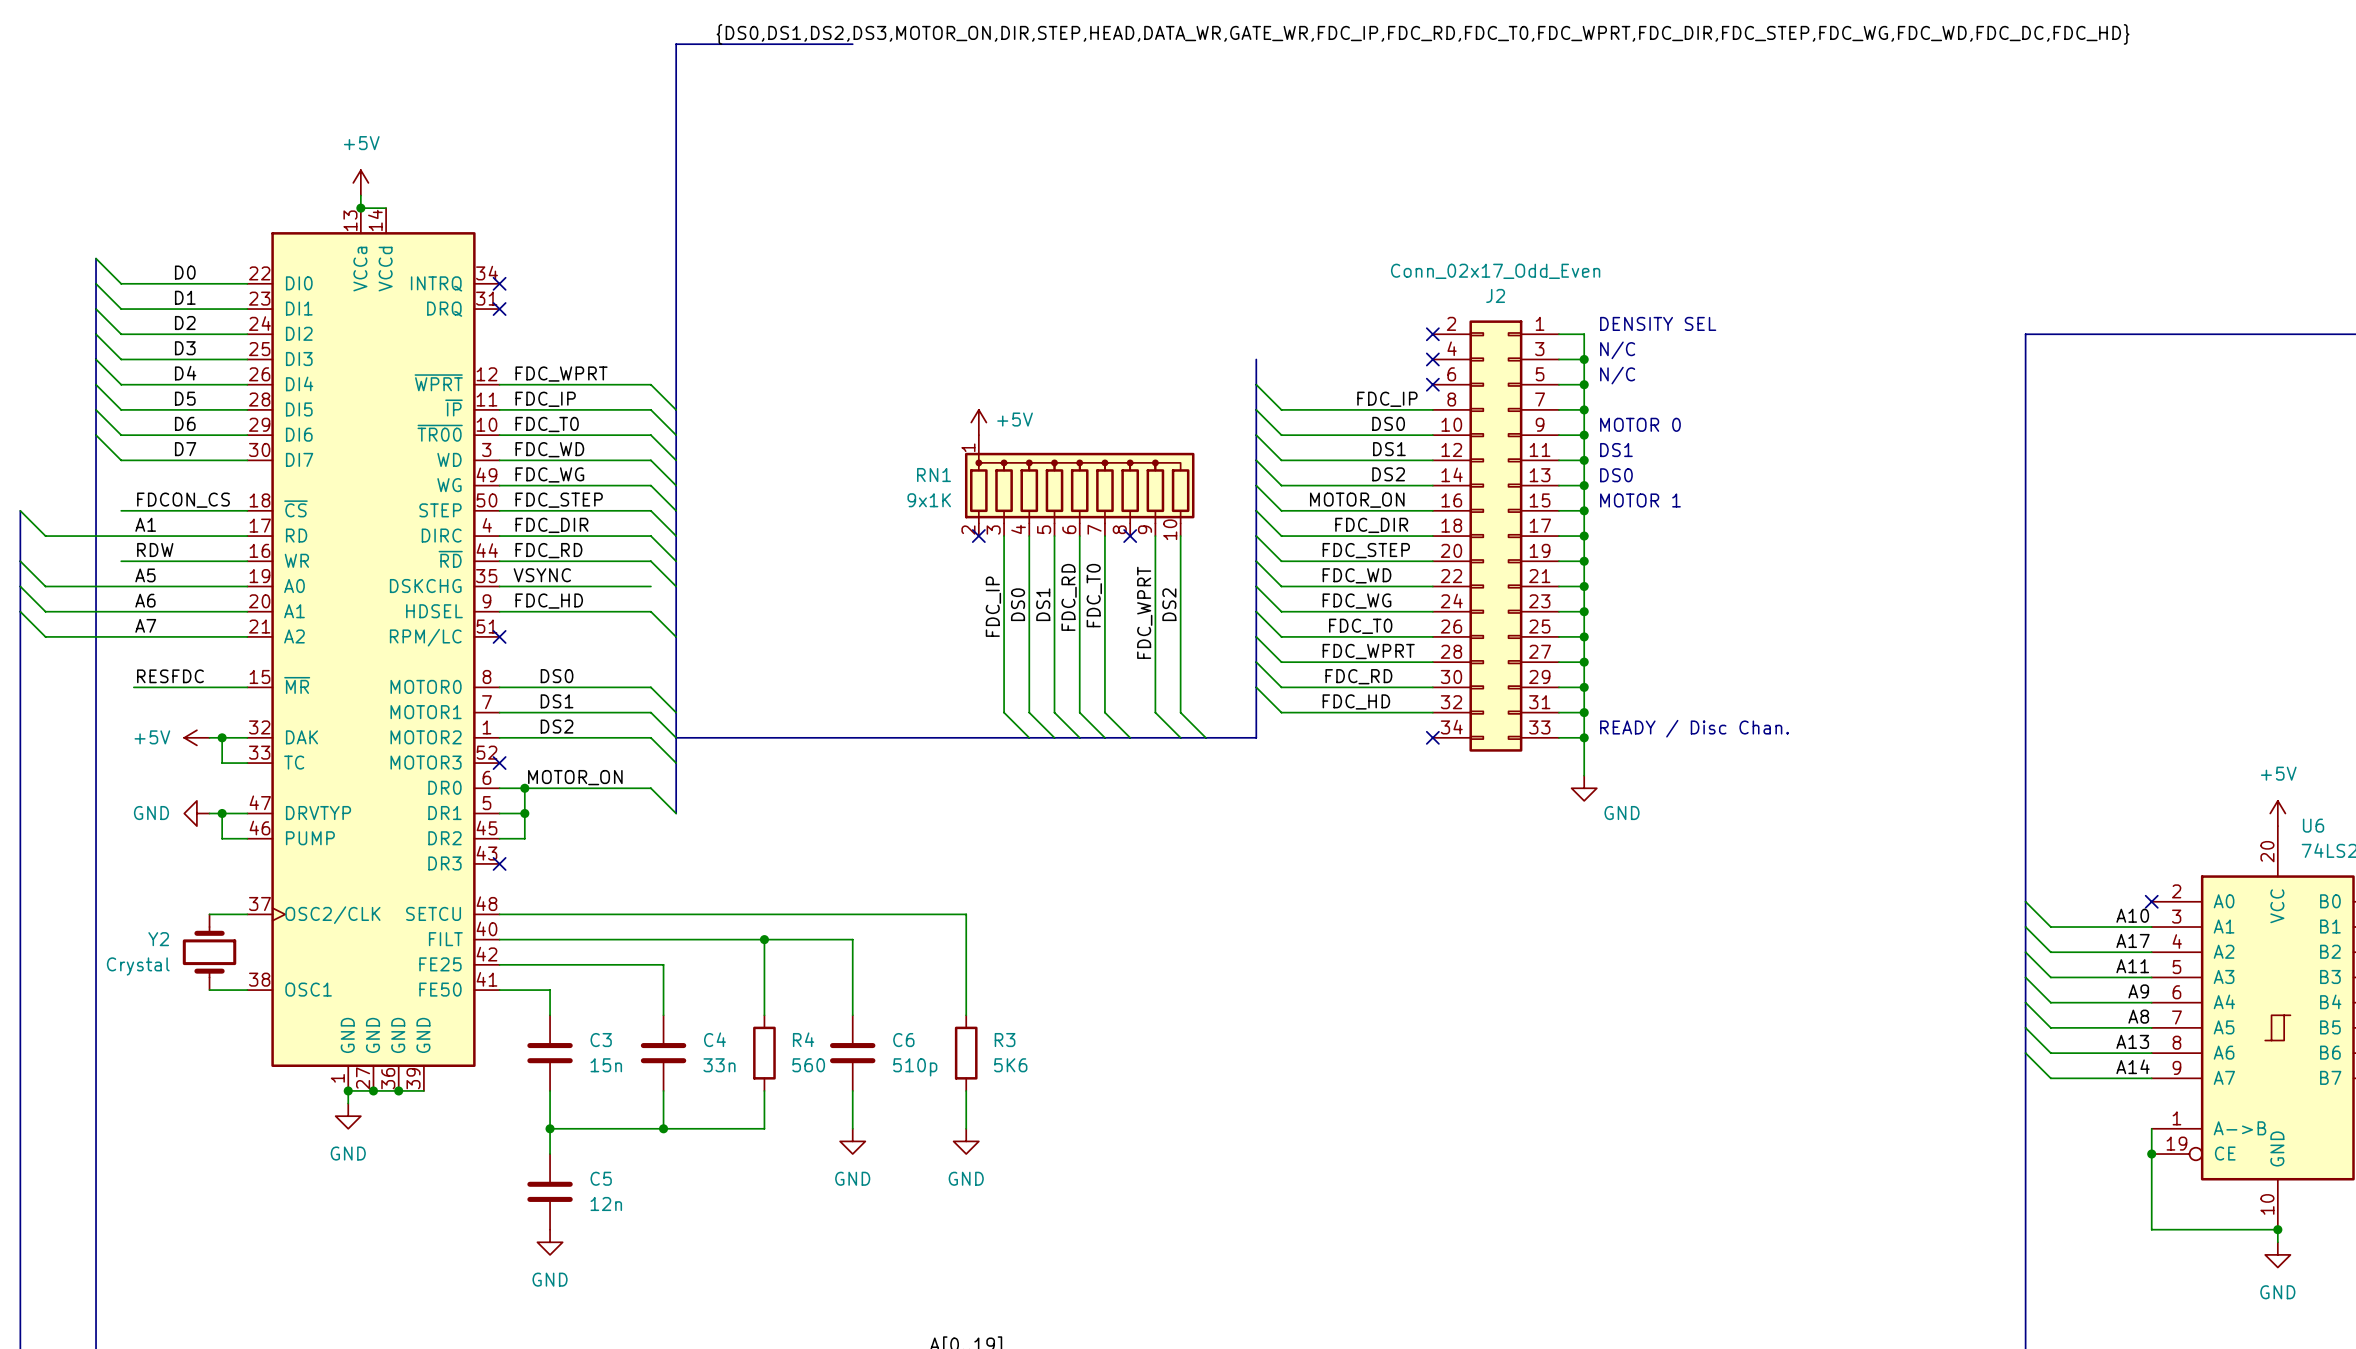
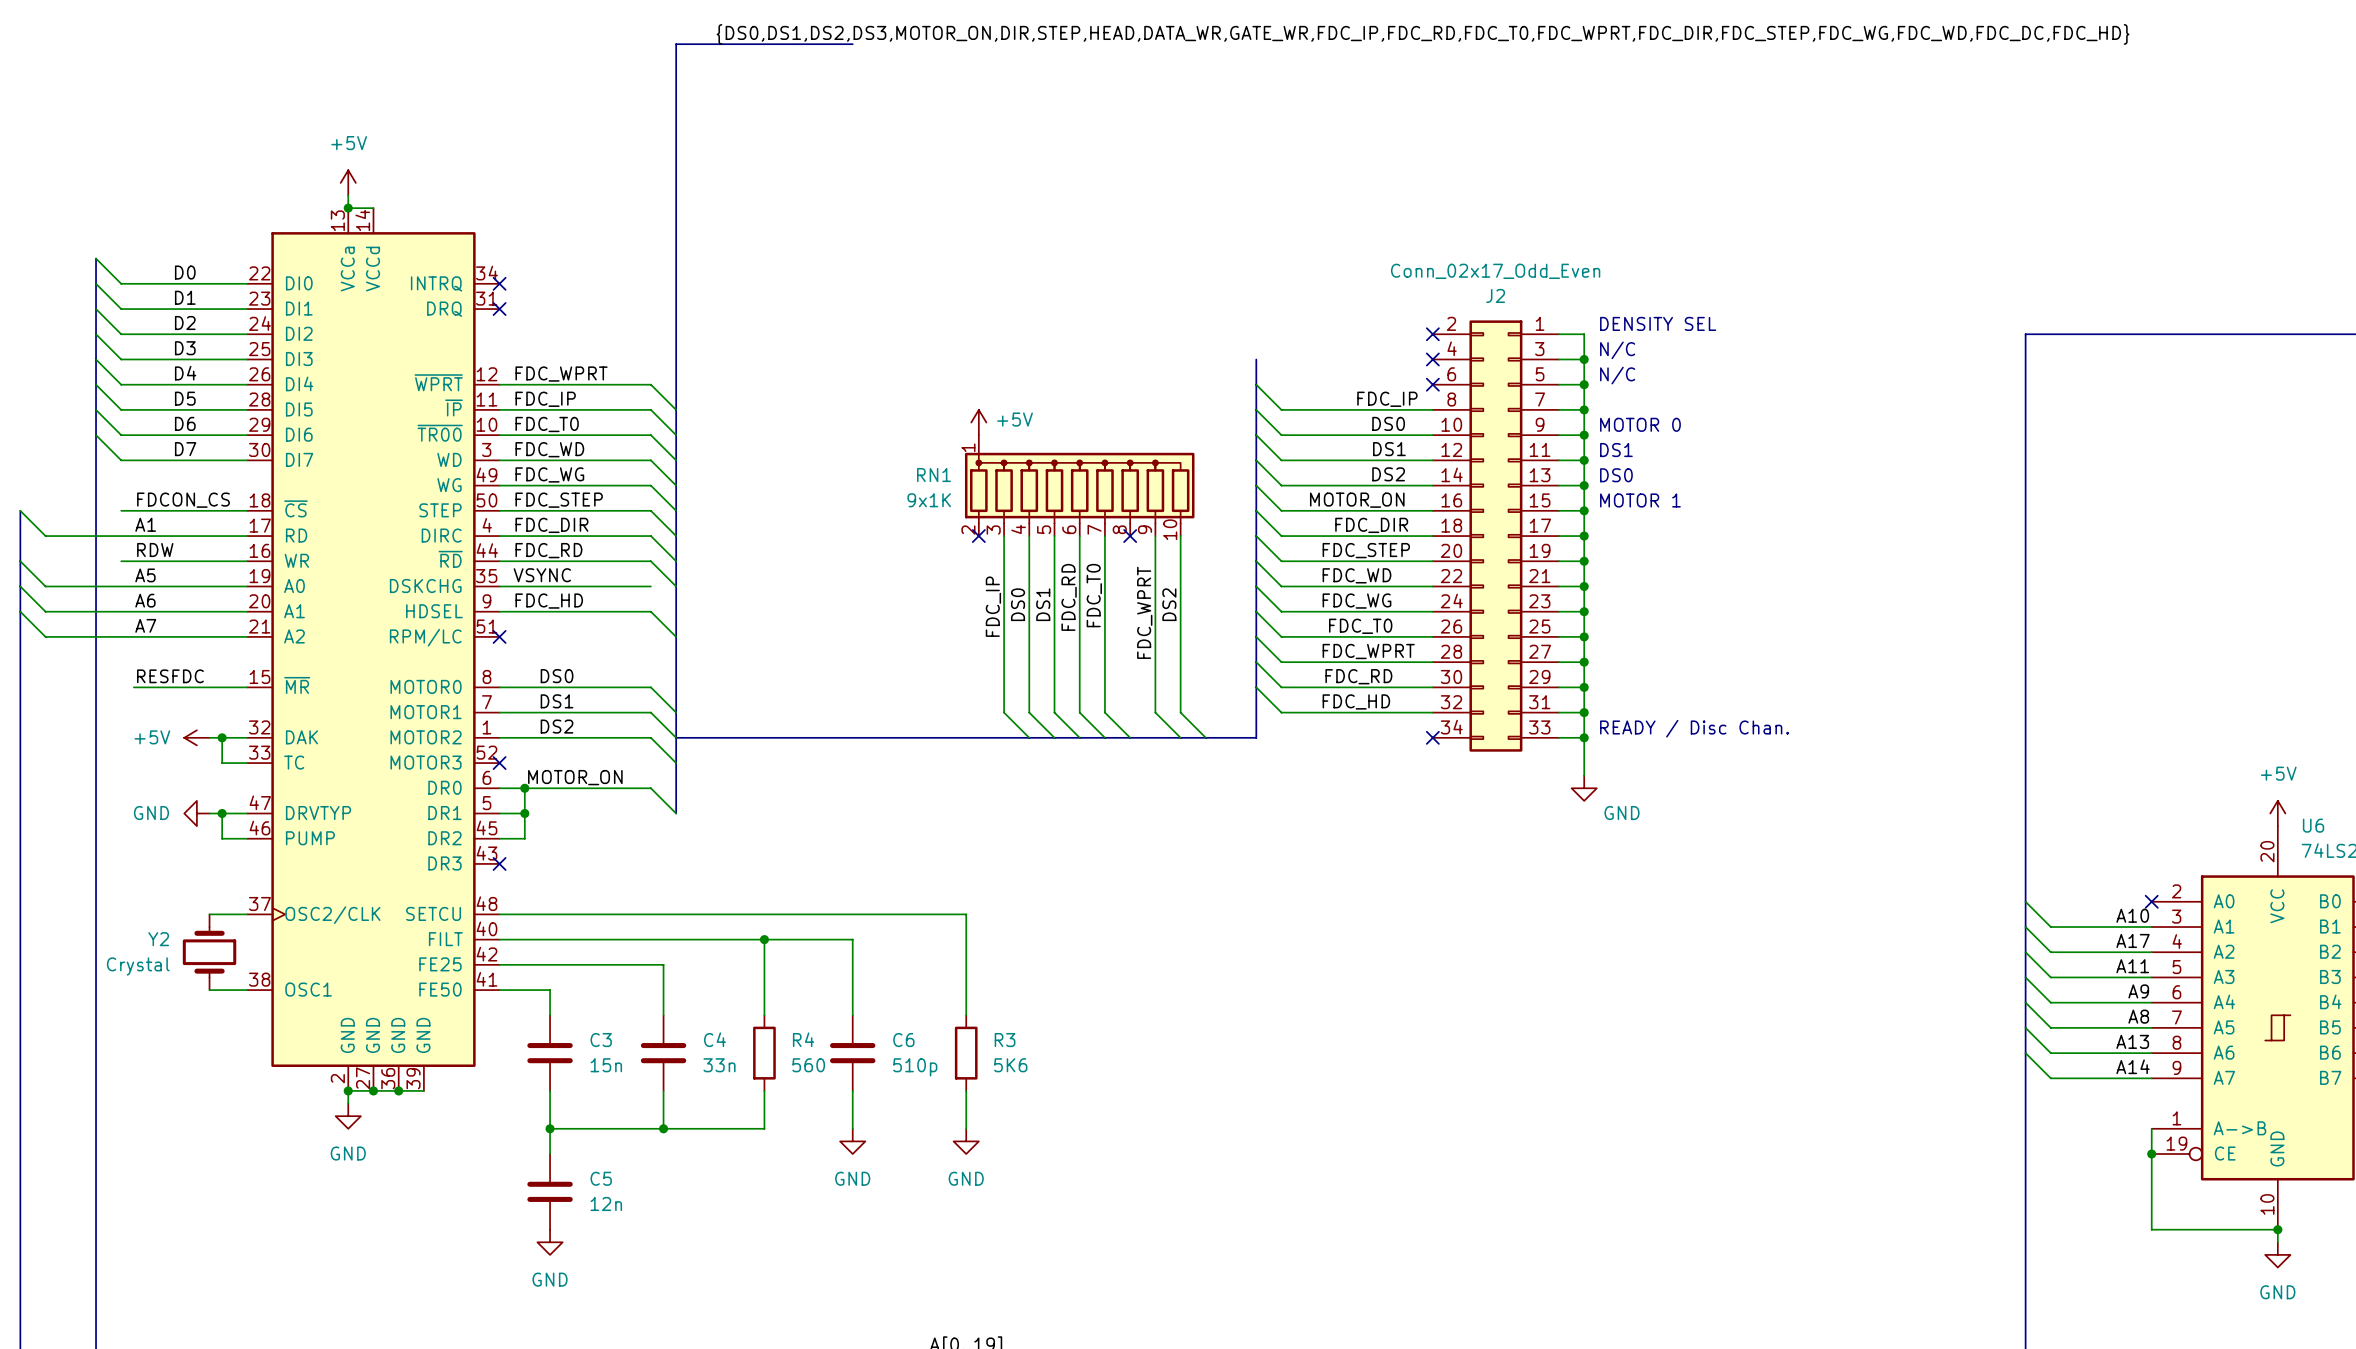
power symbol position: +5V (360, 182) -> +5V (348, 182)
wire: (360, 195) (360, 208) -> (348, 195) (348, 208) (360, 208)
part symbol: [247, 208, 500, 1091] -> [247, 208, 500, 1091]
junction position: (360, 208) -> (348, 208)
wire: (373, 208) (386, 208) -> none

